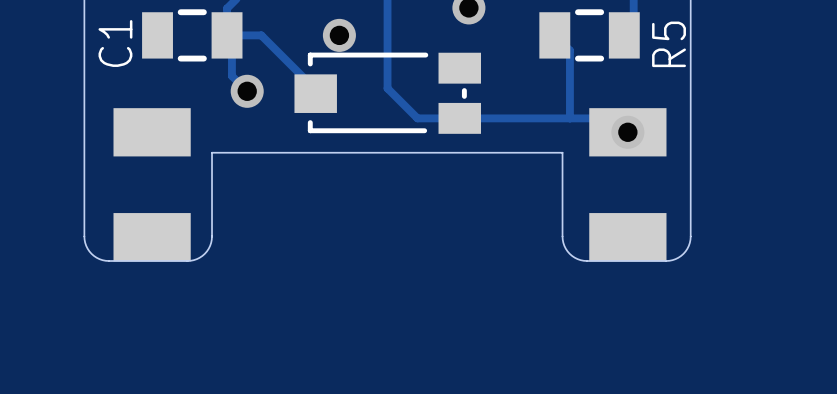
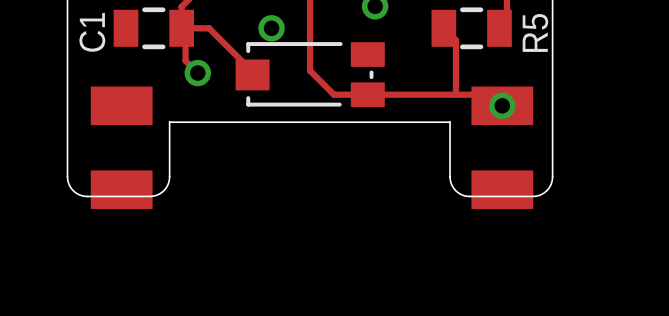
board edge: (84, 221) (84, 239) (87, 248) (96, 257) (108, 261) (187, 261) (196, 259) (204, 253) (210, 245) (212, 221) -> (67, 176) (73, 190) (87, 196) (155, 195) (165, 188) (169, 176)
board edge: (562, 221) (562, 239) (565, 248) (574, 257) (587, 261) (666, 261) (675, 259) (683, 253) (688, 245) (690, 221) -> (450, 176) (455, 190) (469, 196) (538, 195) (548, 188) (552, 176)

